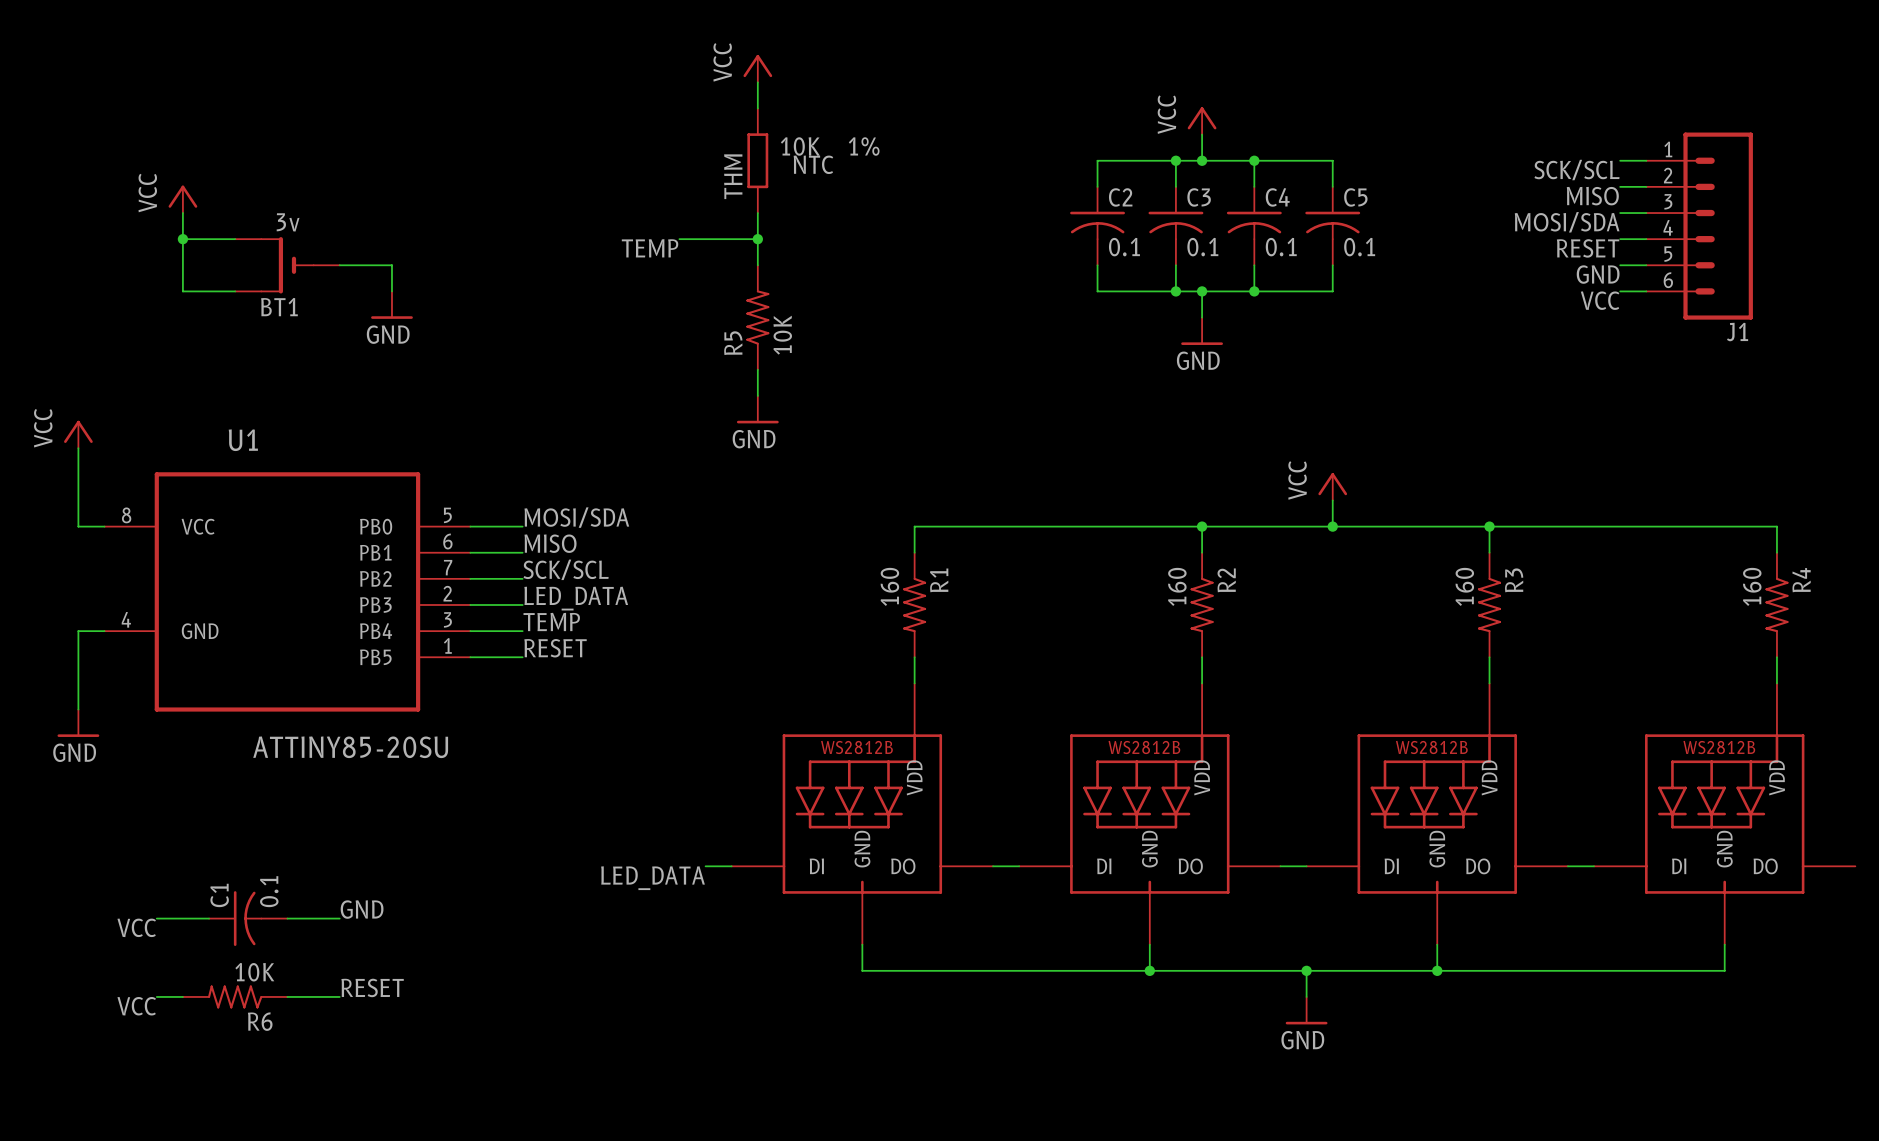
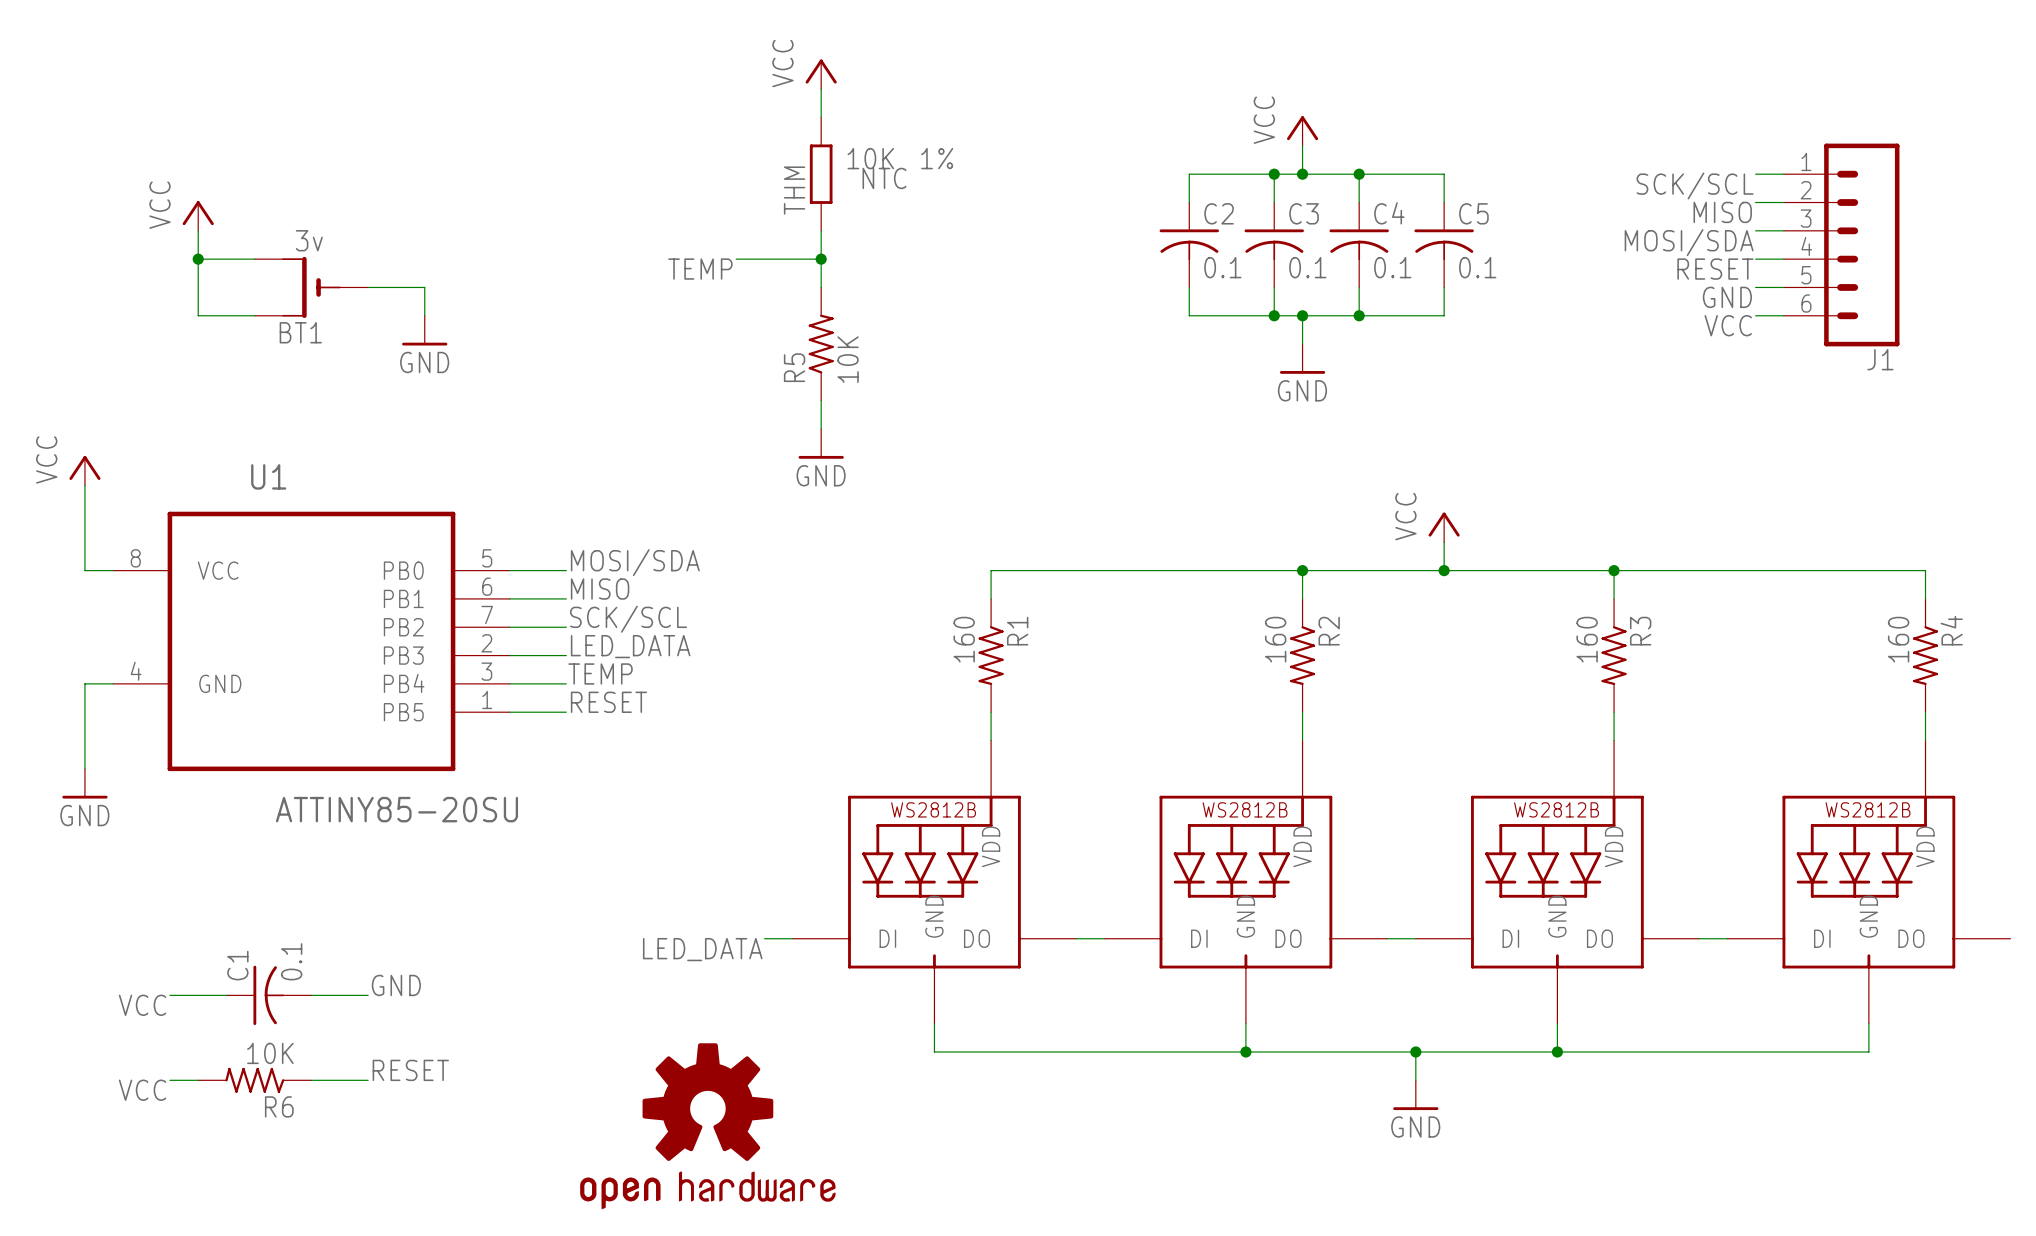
part: none -> (707, 1126)

